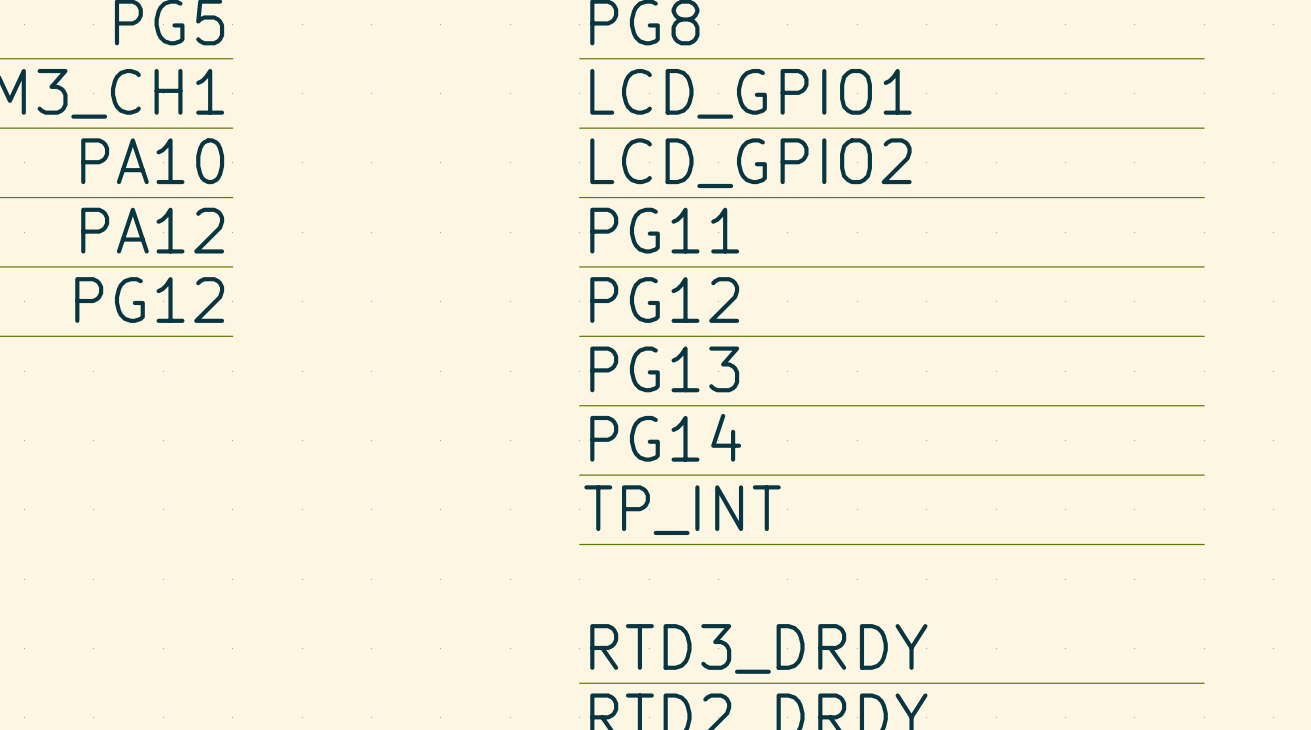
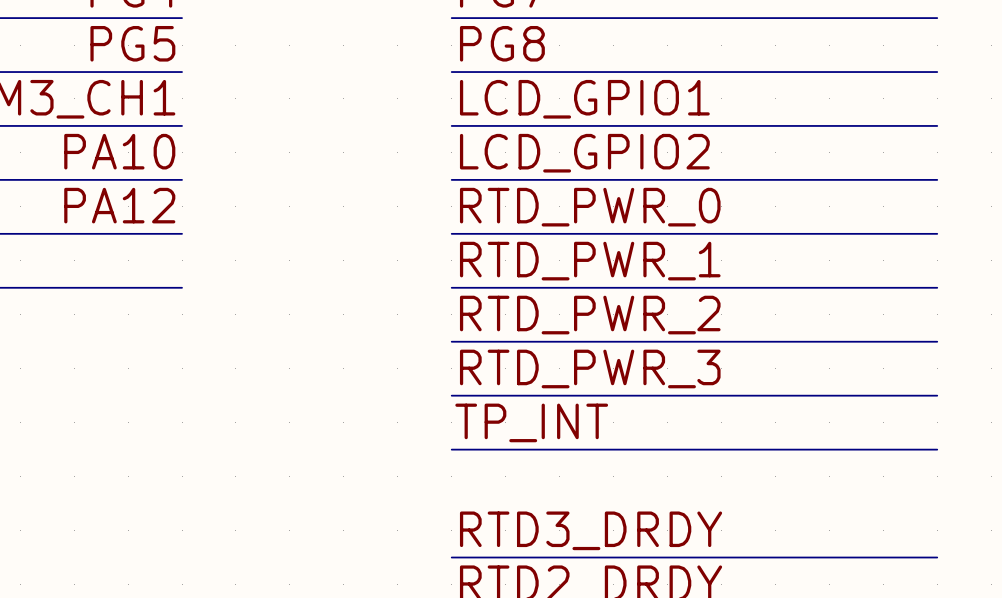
label: PG11 (664, 230) -> RTD_PWR_0 (590, 207)
label: PG12 (149, 300) -> none
label: PG12 (664, 300) -> RTD_PWR_1 (590, 261)
label: PG13 (664, 369) -> RTD_PWR_2 (590, 315)
label: PG14 (665, 437) -> RTD_PWR_3 (590, 368)

